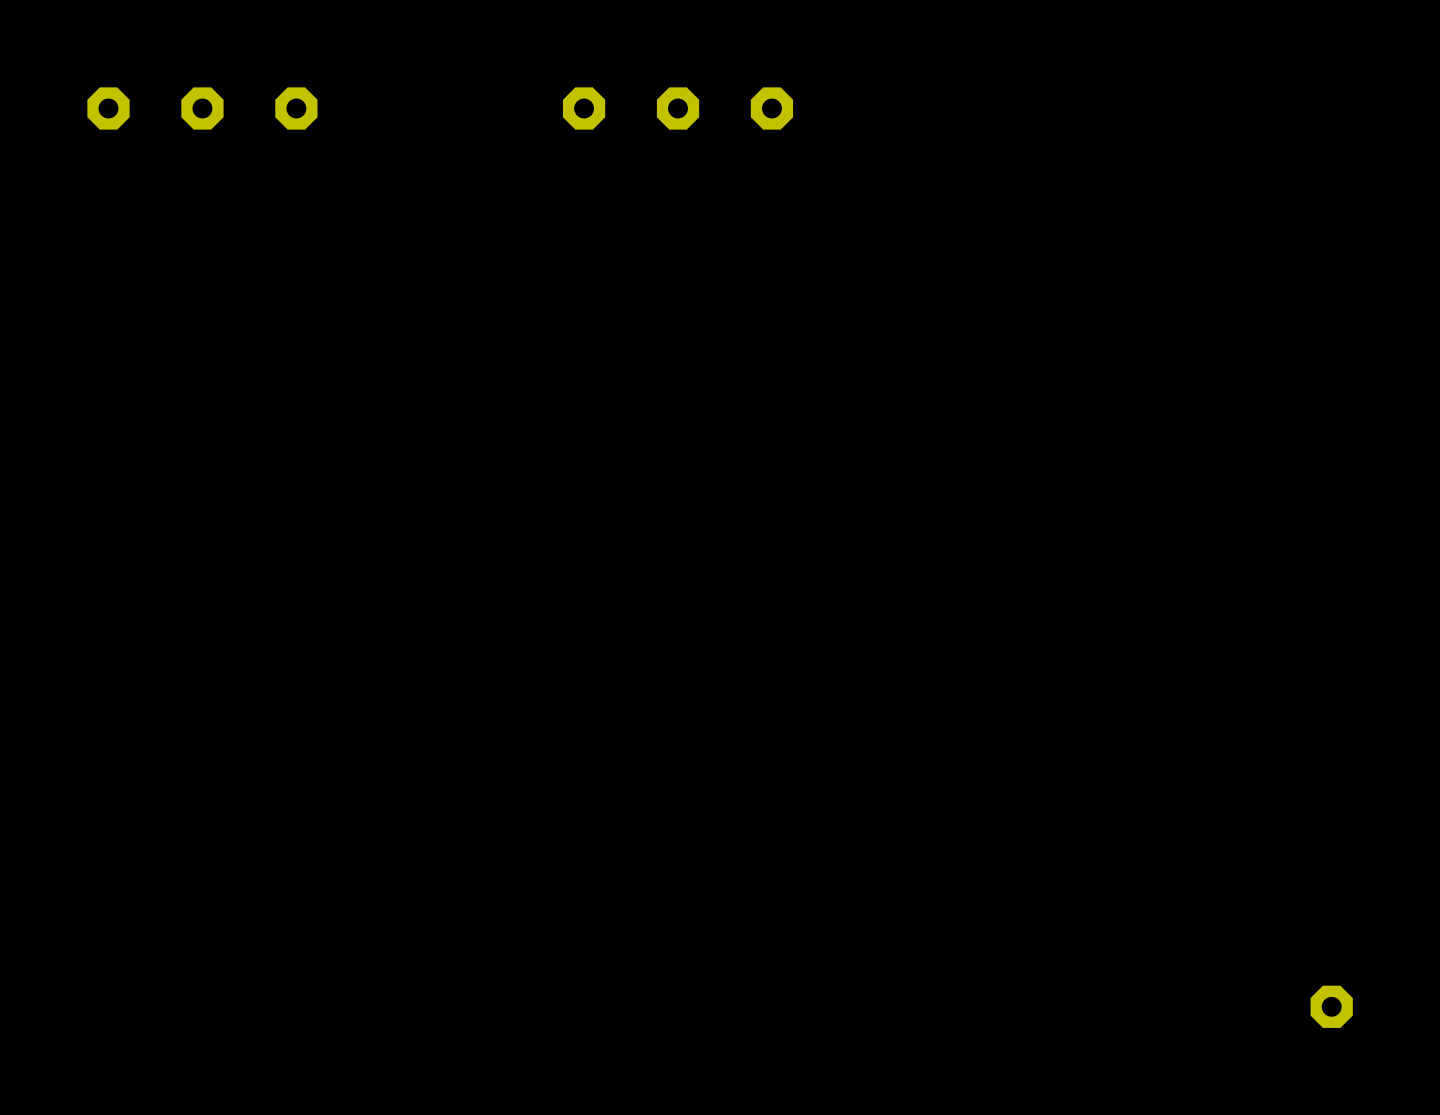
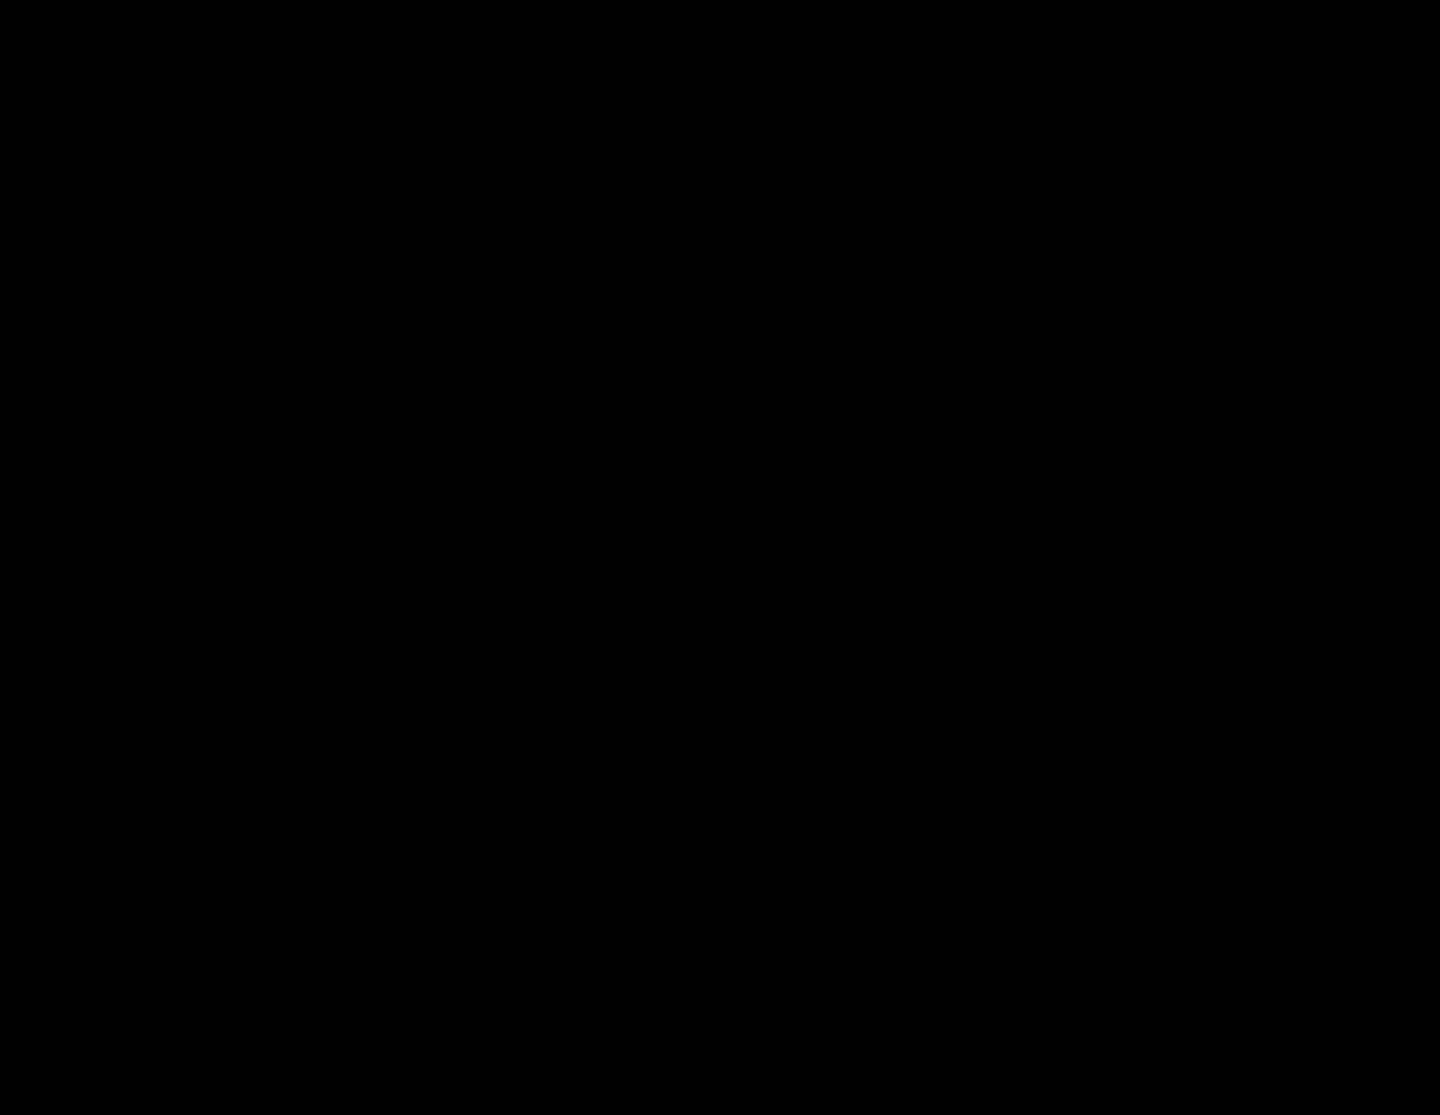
part: (108, 108) -> none
part: (202, 108) -> none
part: (296, 108) -> none
part: (584, 108) -> none
part: (678, 108) -> none
part: (771, 108) -> none
part: (1331, 1006) -> none

